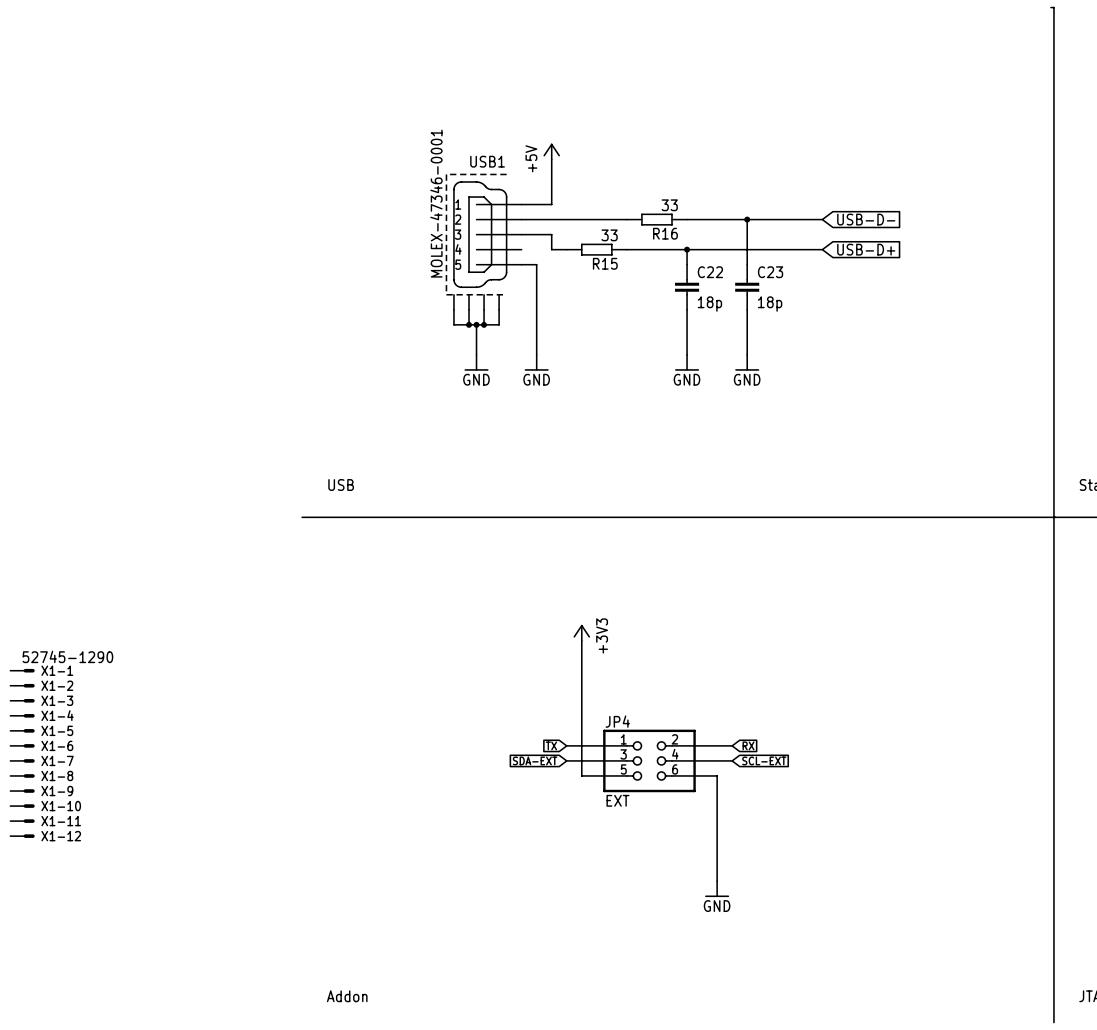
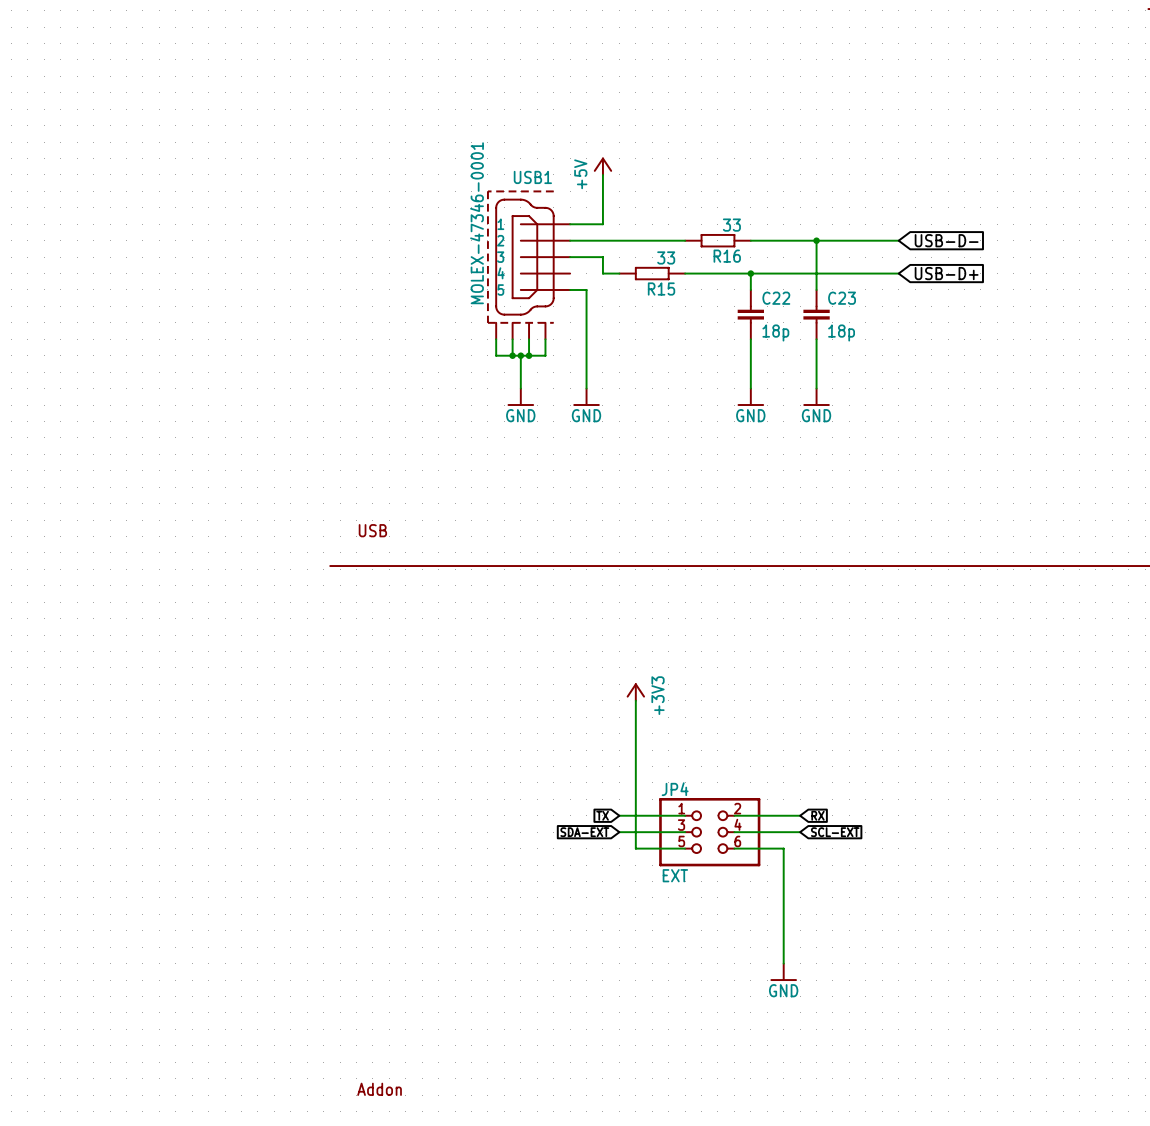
X1-1: 52745-1290 (22, 670) -> none
X1-2: (22, 685) -> none
X1-3: (22, 700) -> none
X1-4: (22, 715) -> none
X1-5: (22, 730) -> none
X1-6: (22, 745) -> none
X1-7: (22, 760) -> none
X1-8: (22, 775) -> none
X1-9: (22, 791) -> none
X1-10: (22, 806) -> none
X1-11: (22, 821) -> none
X1-12: (22, 836) -> none

